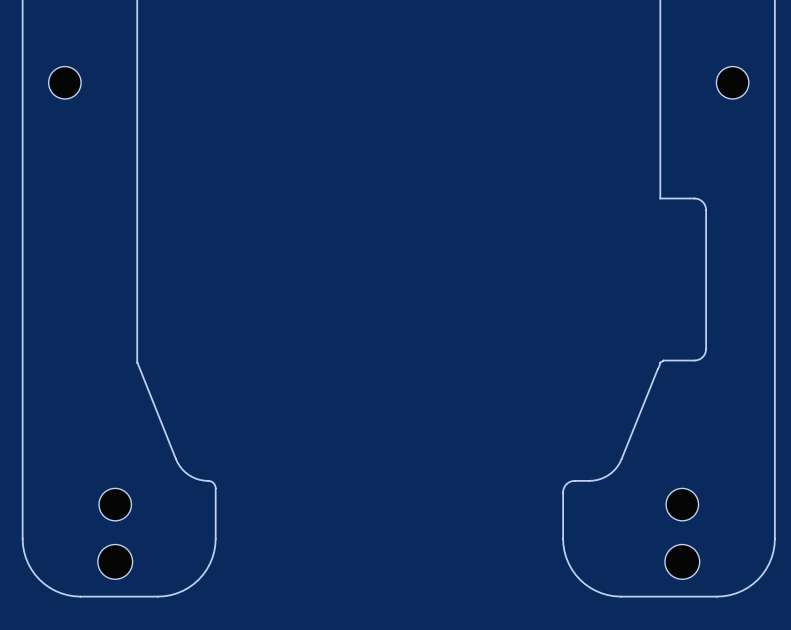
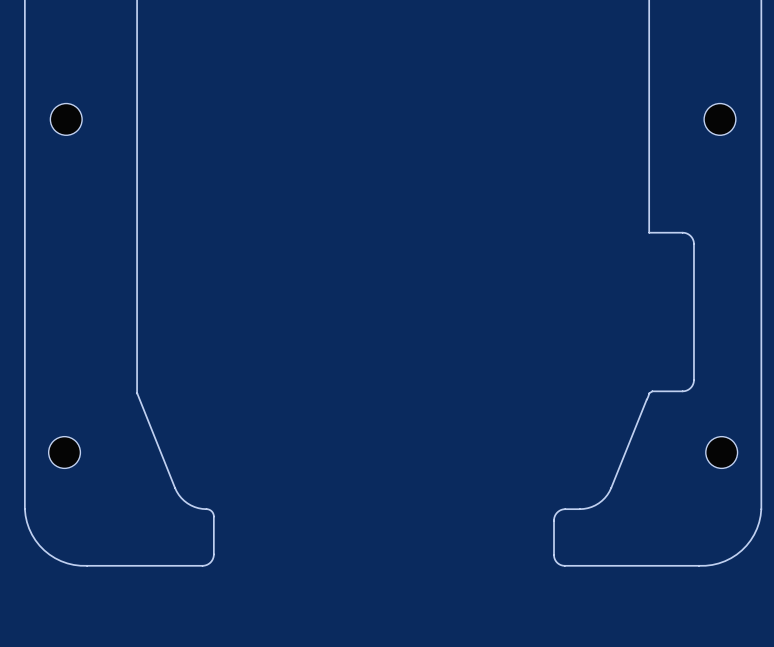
board edge: (22, 480) (22, 538) (25, 557) (35, 574) (44, 584) (67, 595) (157, 596) (182, 590) (198, 579) (209, 563) (215, 545) (215, 527) -> (24, 509) (29, 528) (39, 545) (49, 554) (67, 563) (80, 565) (202, 565) (210, 562) (213, 554)
board edge: (774, 480) (774, 538) (771, 557) (762, 574) (753, 584) (729, 595) (620, 596) (601, 593) (584, 584) (571, 569) (564, 551) (563, 527) -> (761, 509) (757, 528) (746, 545) (731, 558) (712, 564) (564, 565) (557, 562) (554, 555)
hole position: (115, 504) -> (64, 452)
hole position: (682, 504) -> (721, 452)
hole: (115, 561) -> none
hole: (682, 561) -> none

